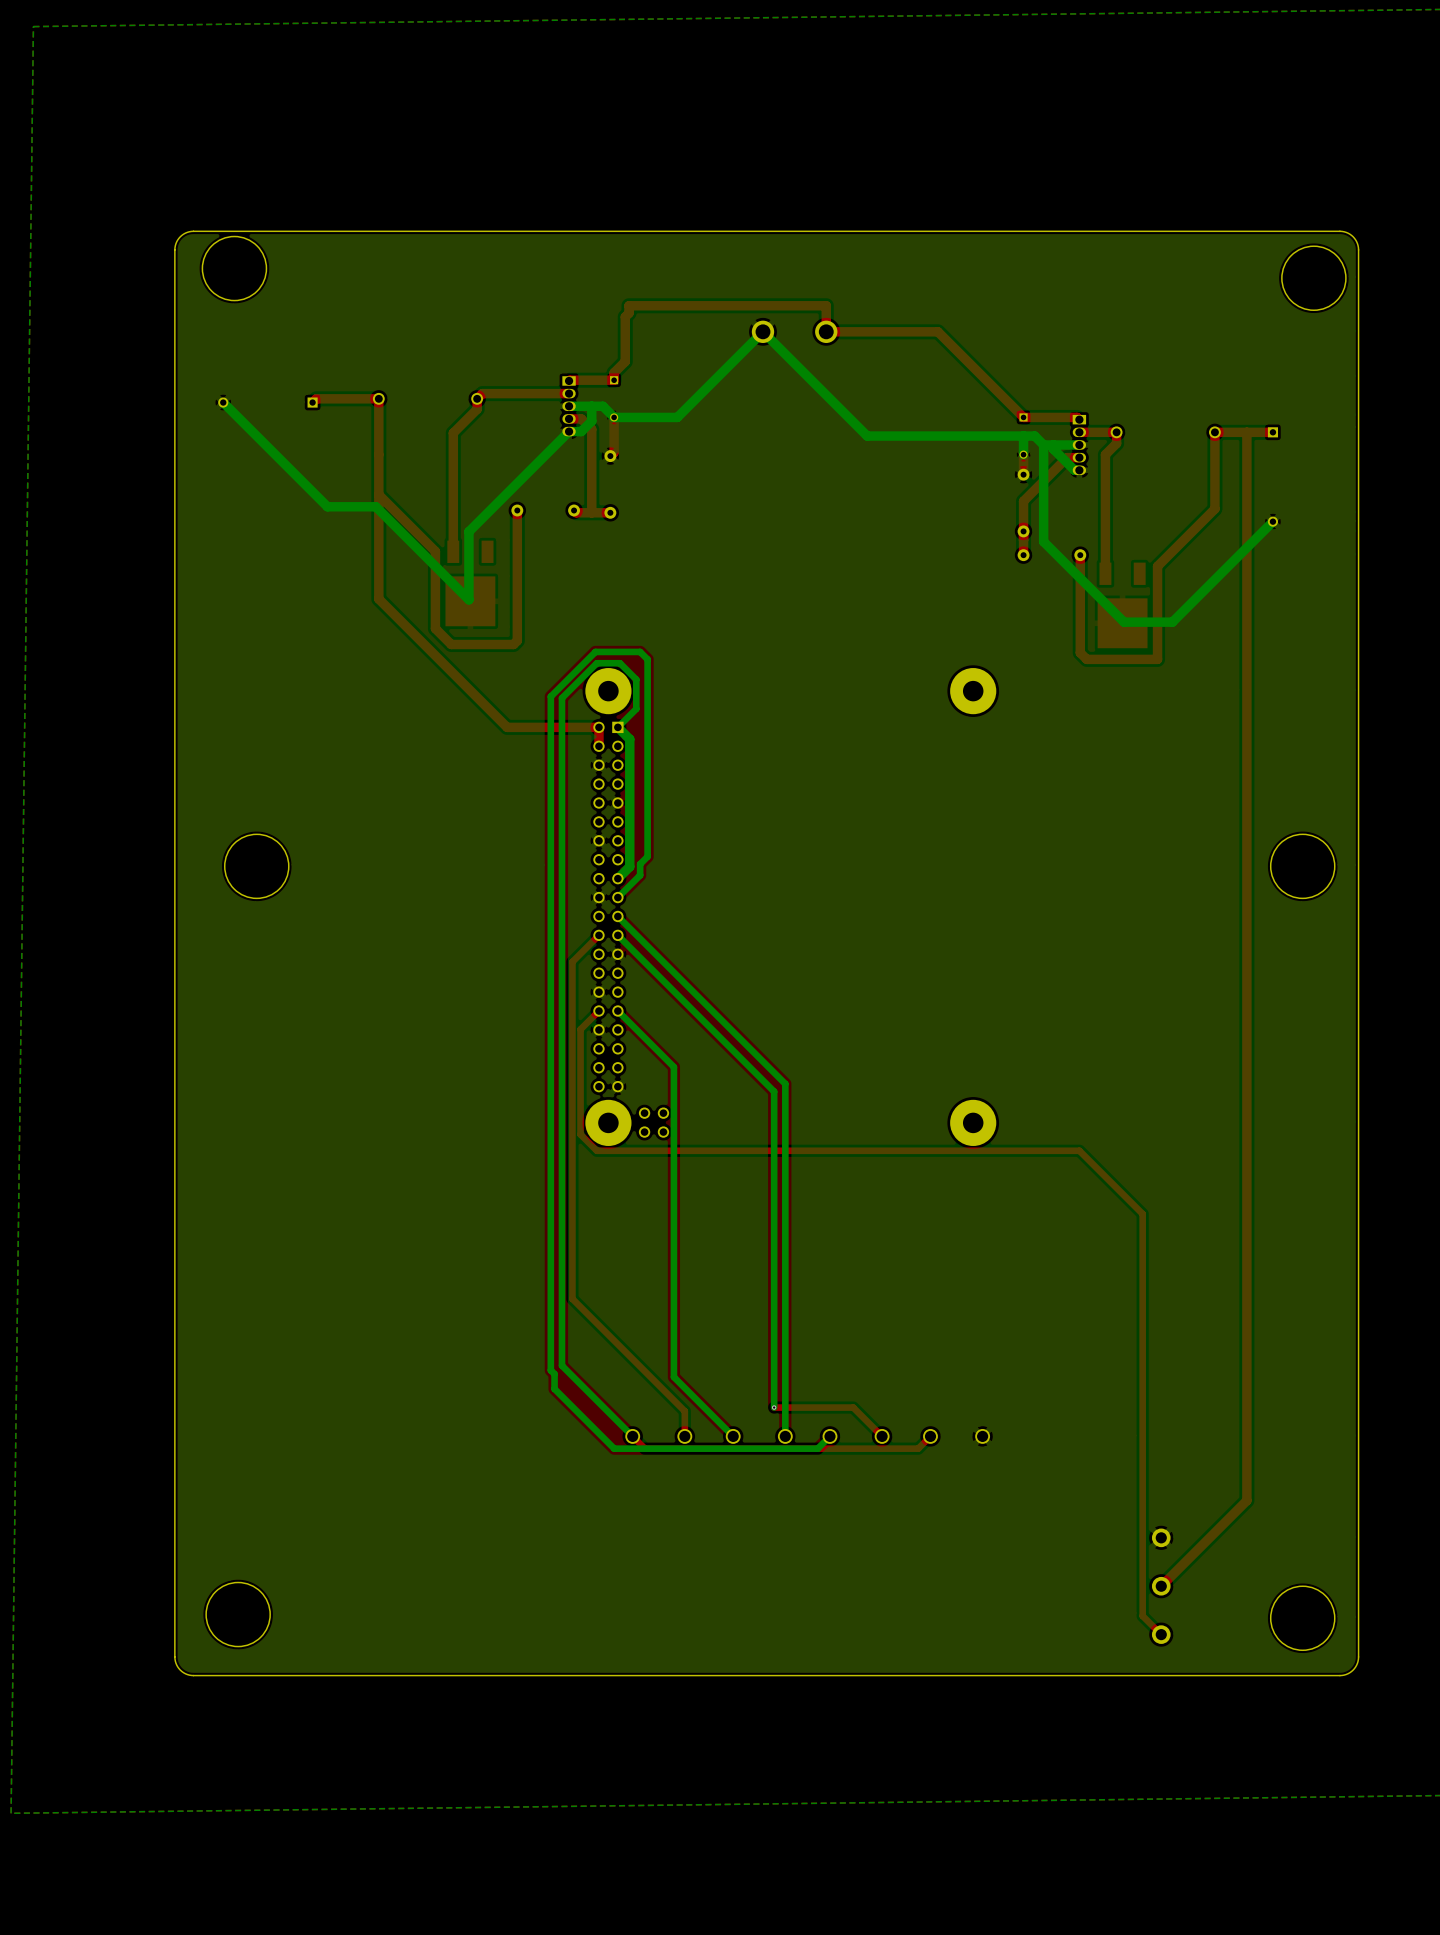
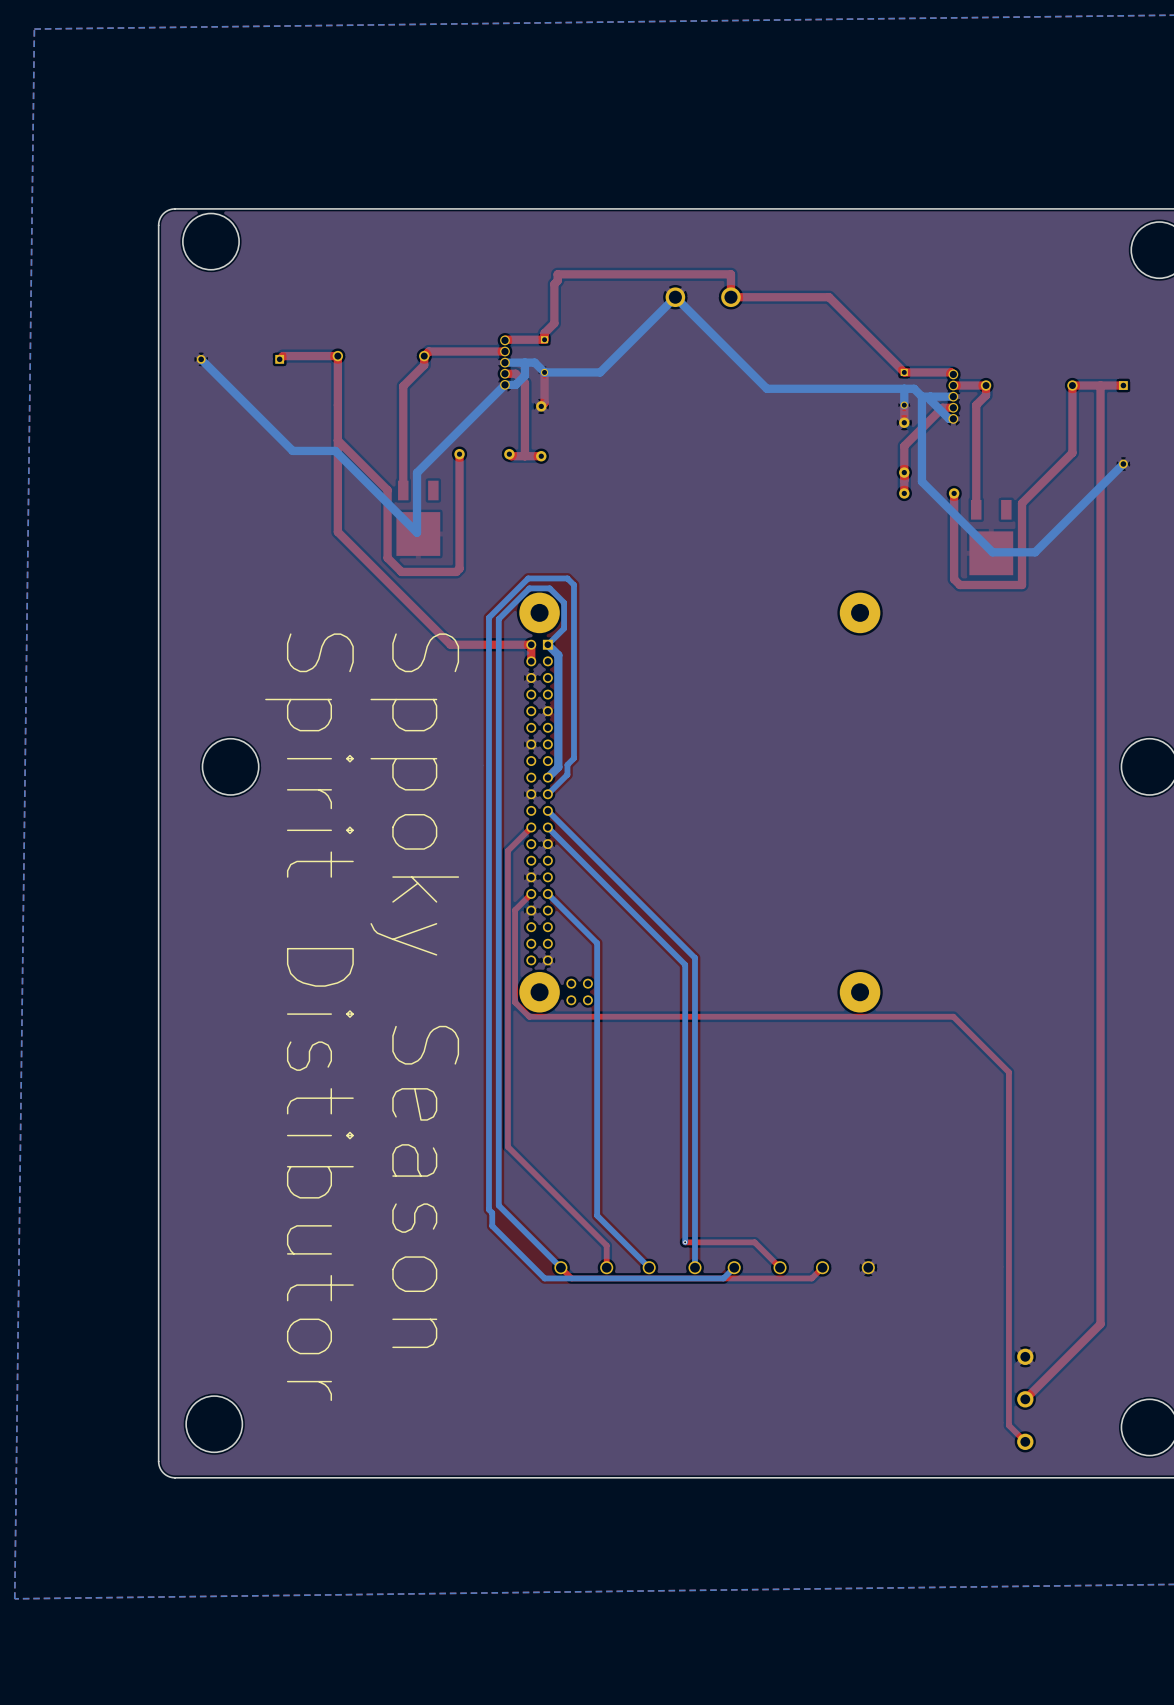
part footprint: [562, 376, 576, 437] -> [500, 335, 510, 390]
part footprint: [1072, 414, 1087, 476] -> [948, 369, 959, 424]
text: none -> Sppoky Season (414, 990)
text: none -> Spirit Distibutor (309, 1017)

